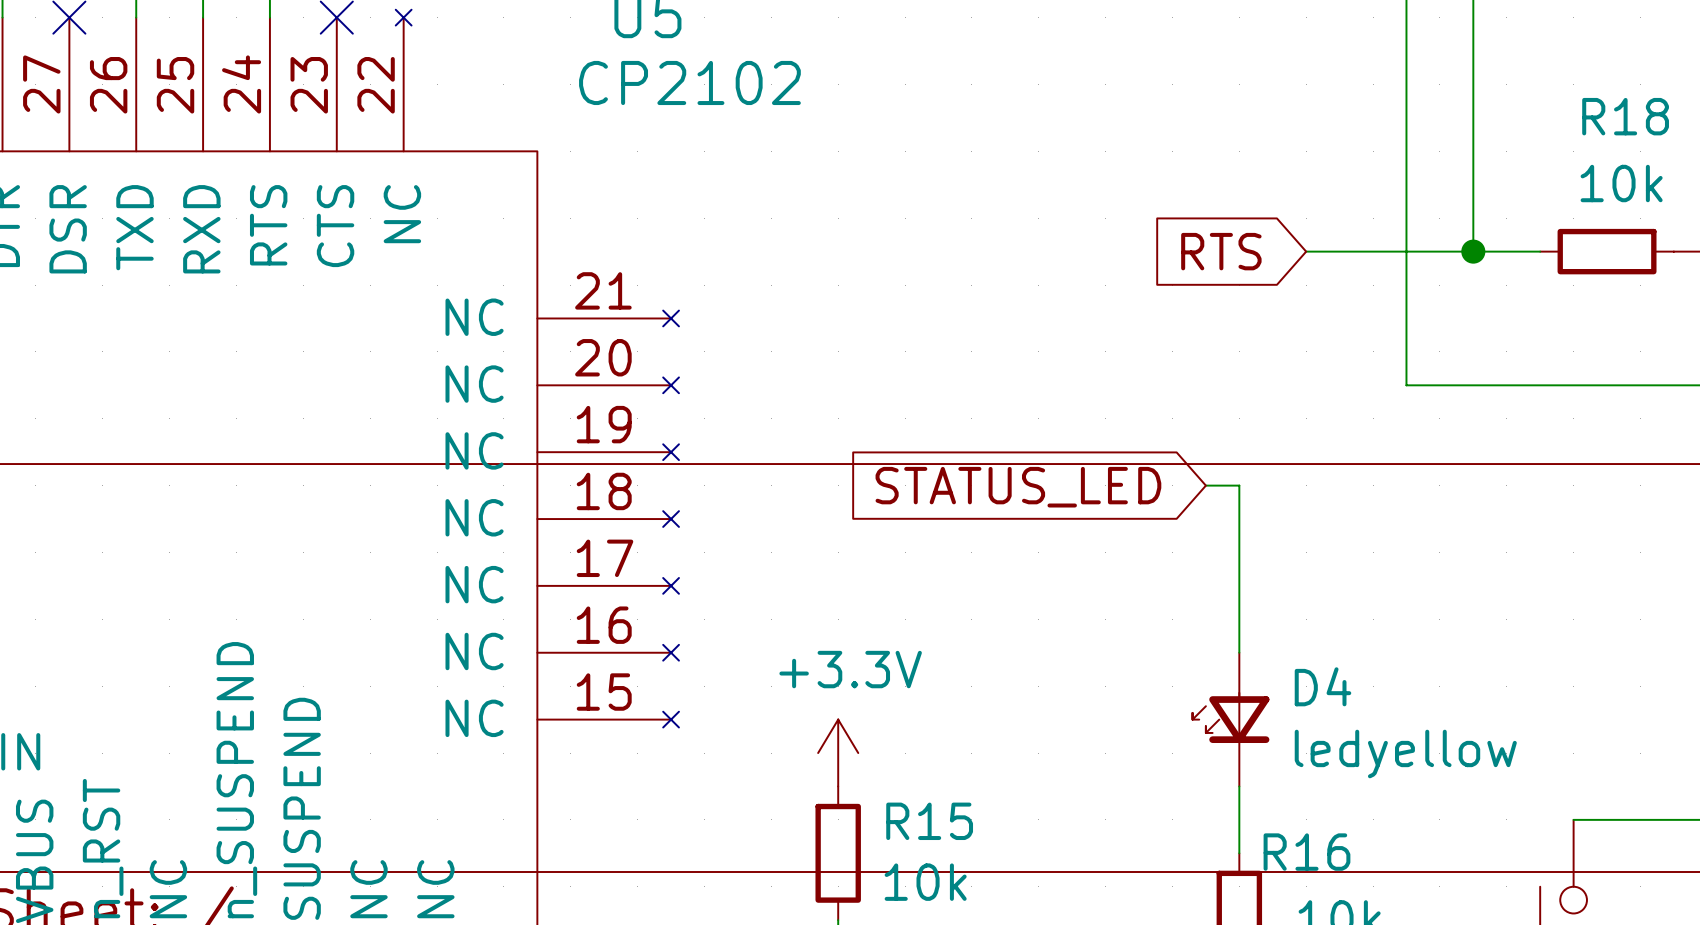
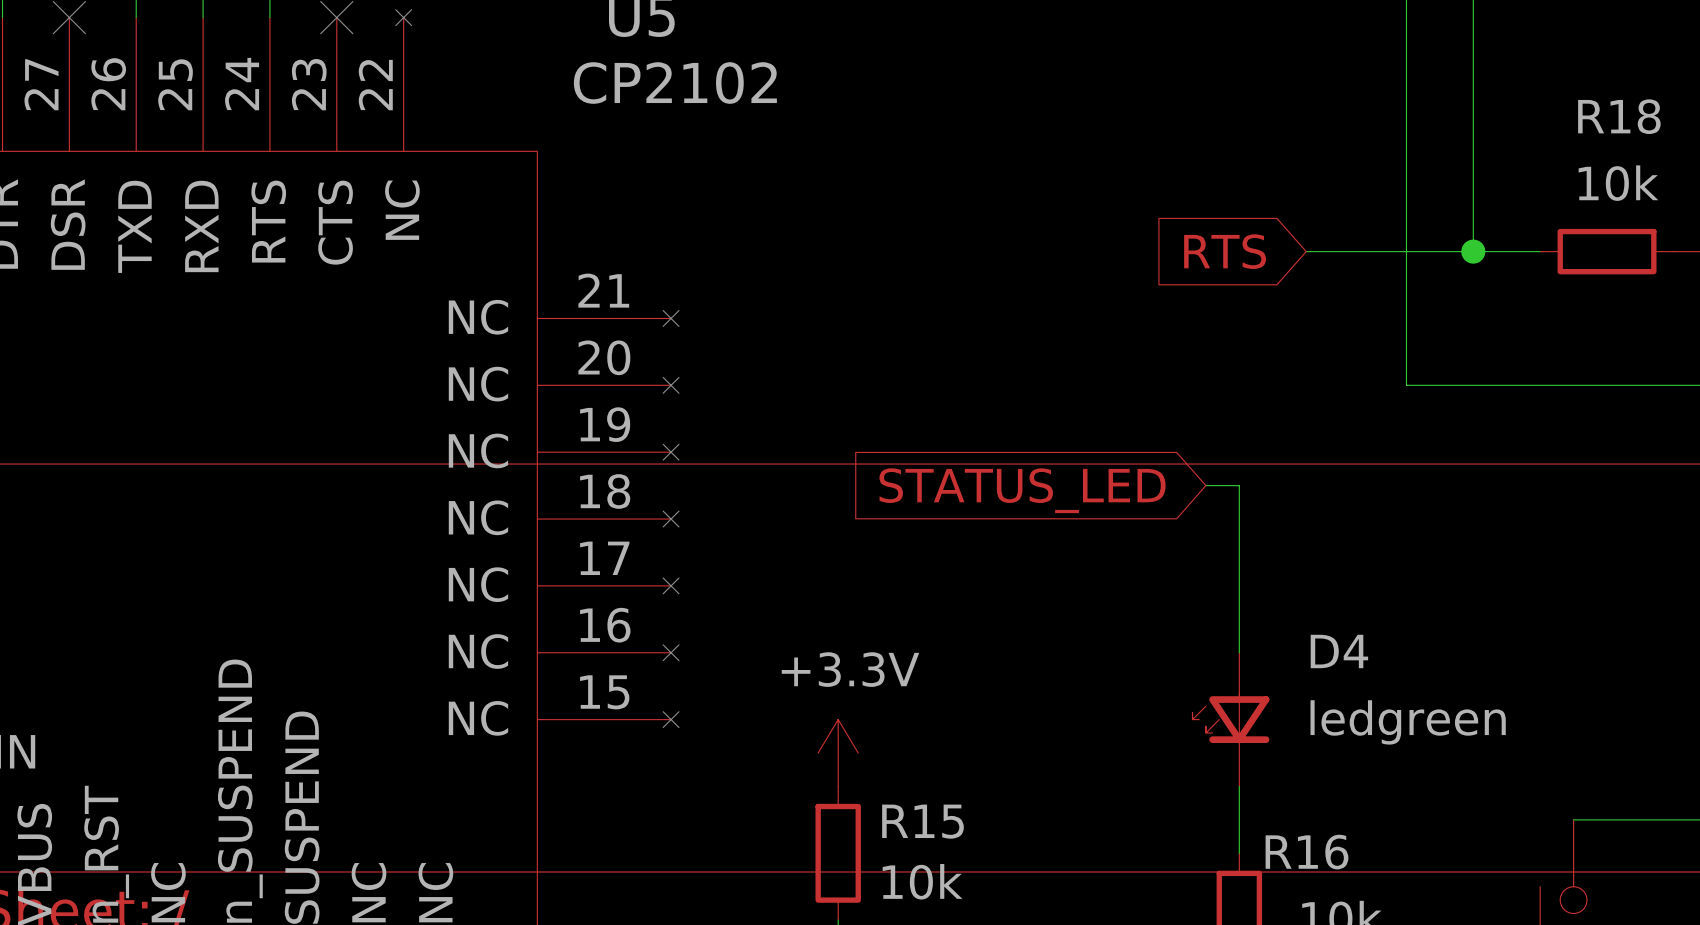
D4 name position: D4 (1322, 686) -> D4 (1339, 651)
D4 value: ledyellow (1405, 754) -> ledgreen (1408, 722)

